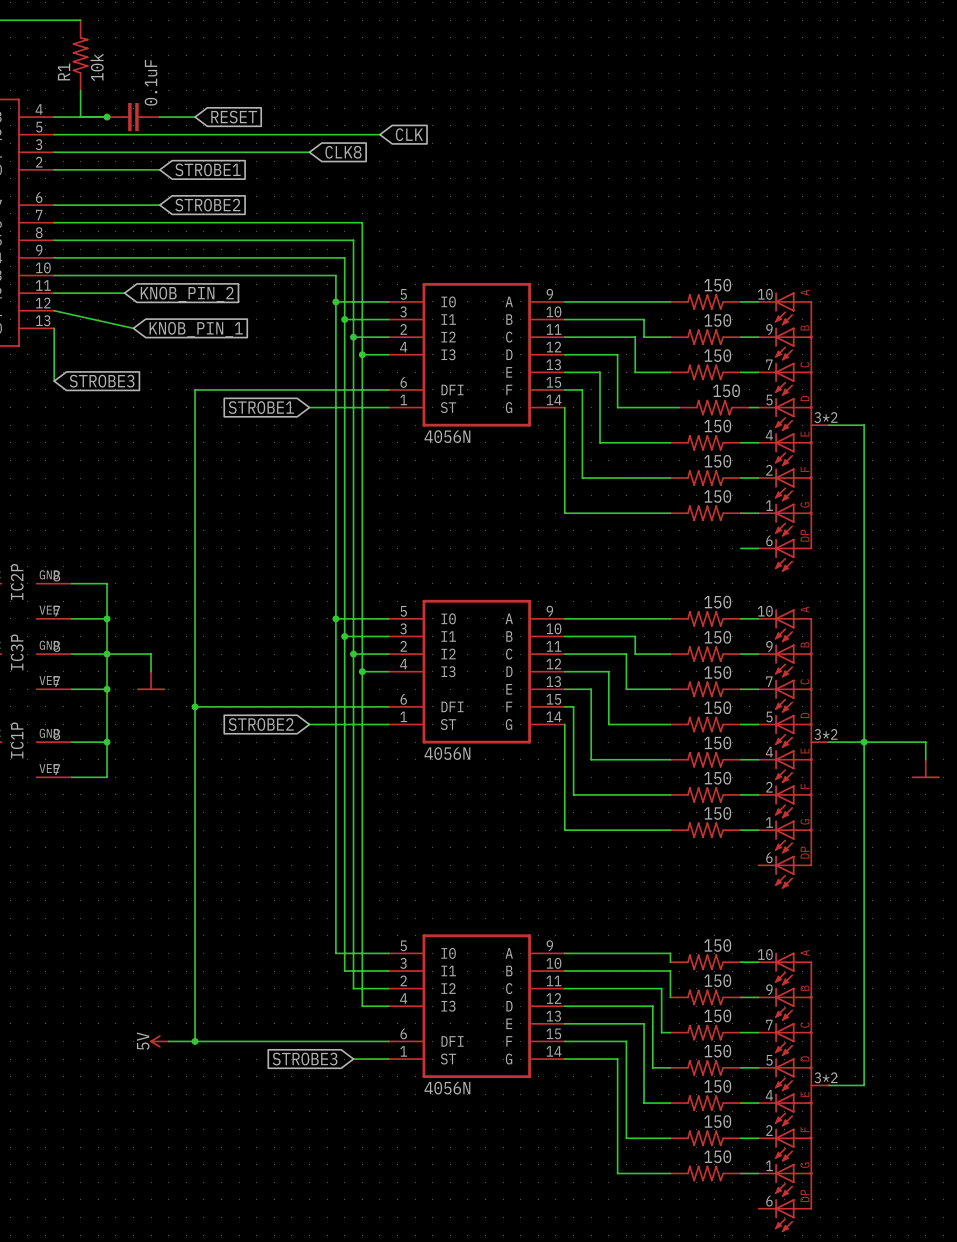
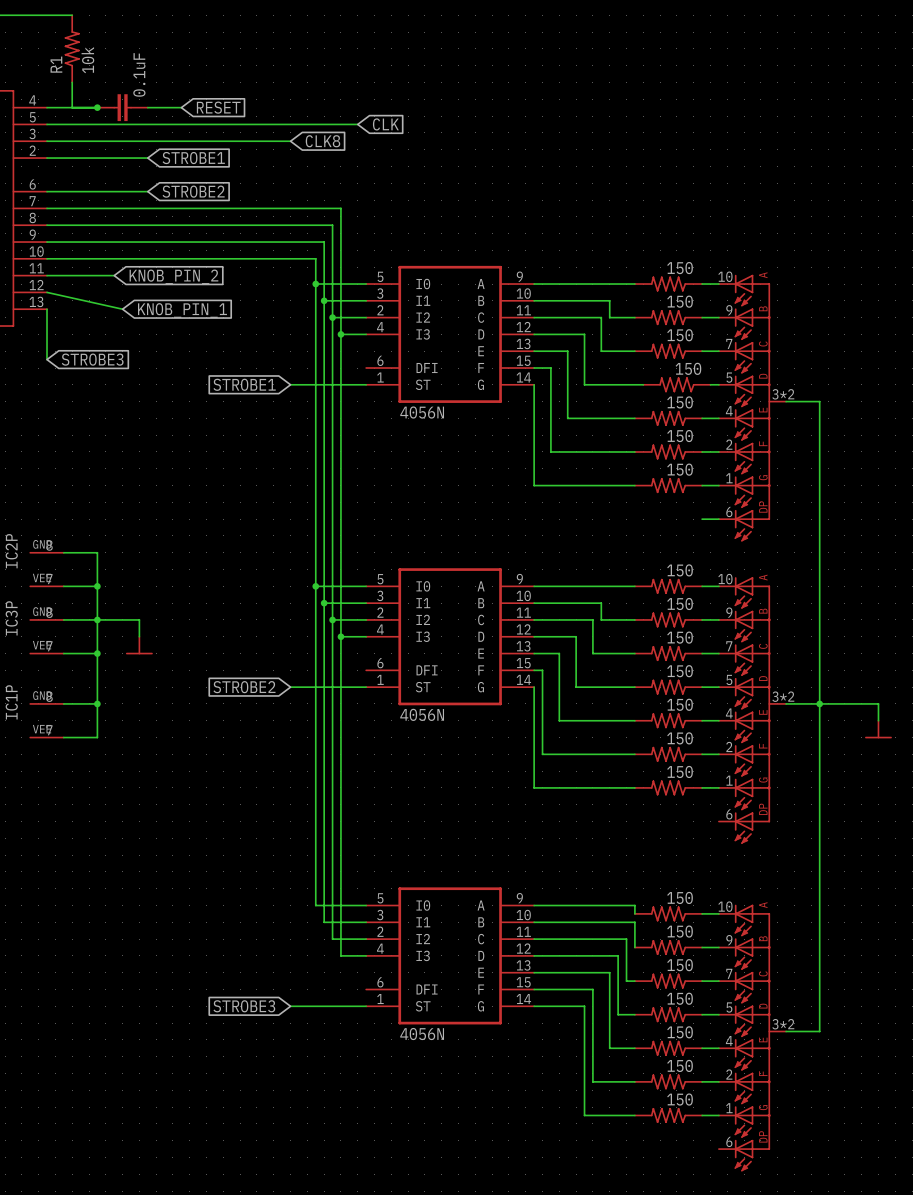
wire: (388, 389) (195, 389) (195, 1041) -> none
wire: (195, 706) (388, 706) -> none
junction: (195, 706) -> none
power symbol: 5V (159, 1041) -> none
wire: (168, 1041) (388, 1041) -> none
junction: (195, 1041) -> none
global label position: STROBE3 (305, 1059) -> STROBE3 (244, 1006)
wire: none -> (290, 1006) (332, 1006)

